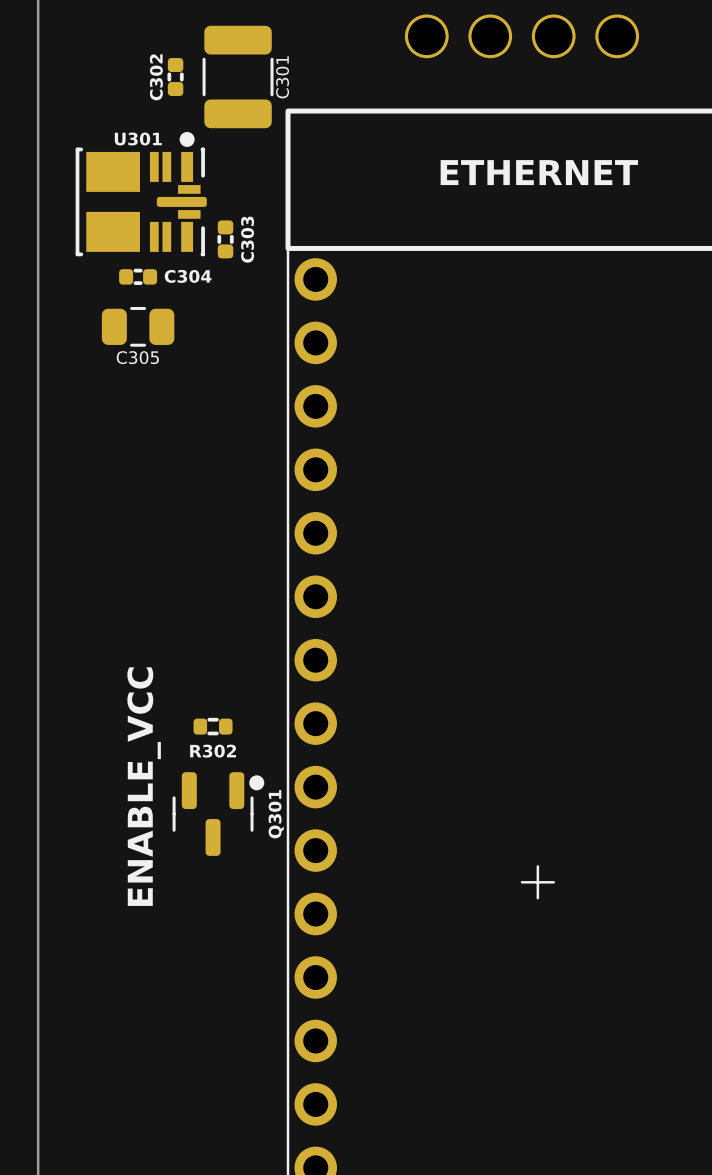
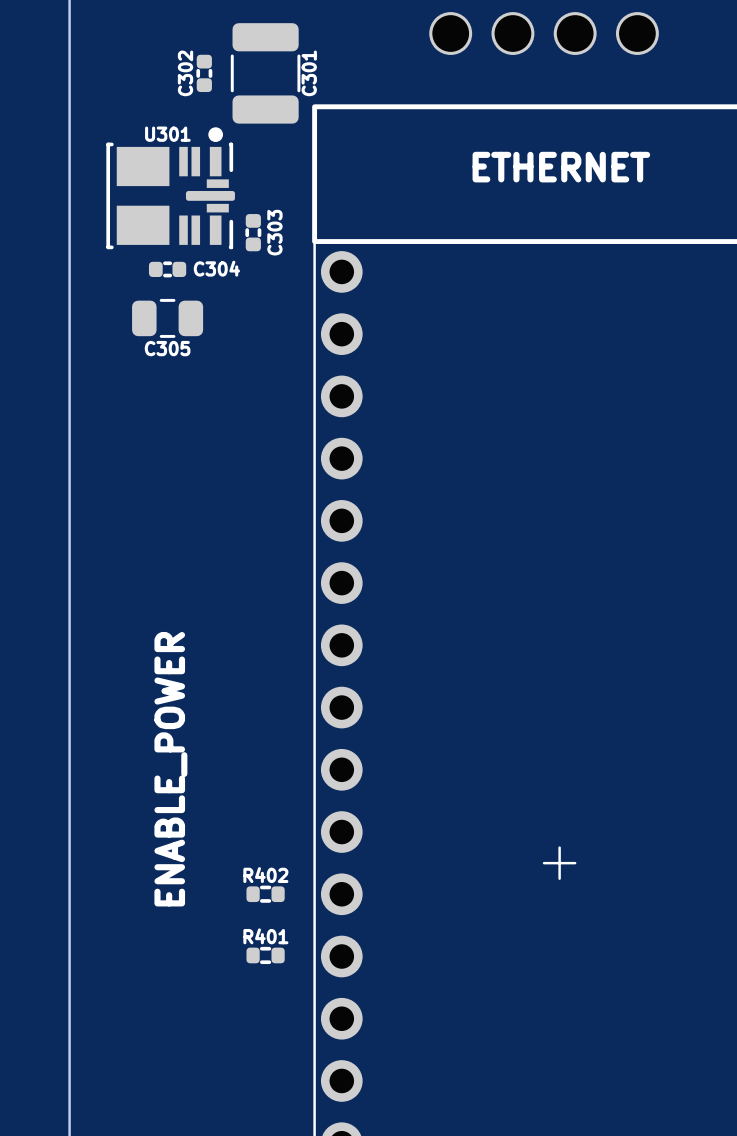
R302: (213, 726) -> none
text: ENABLE_VCC (144, 786) -> ENABLE_POWER (170, 769)
Q301: (218, 814) -> none
R402: none -> (265, 894)
R401: none -> (265, 955)

